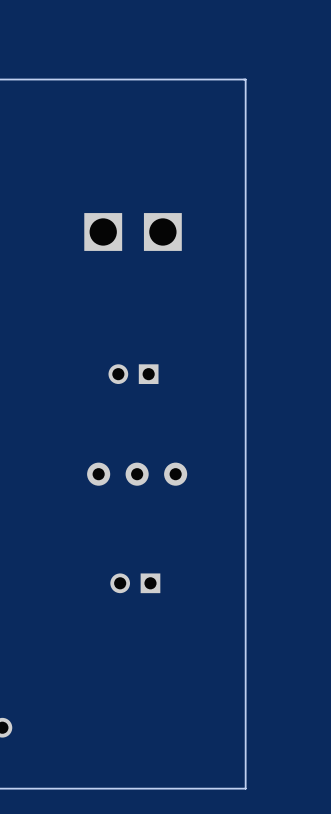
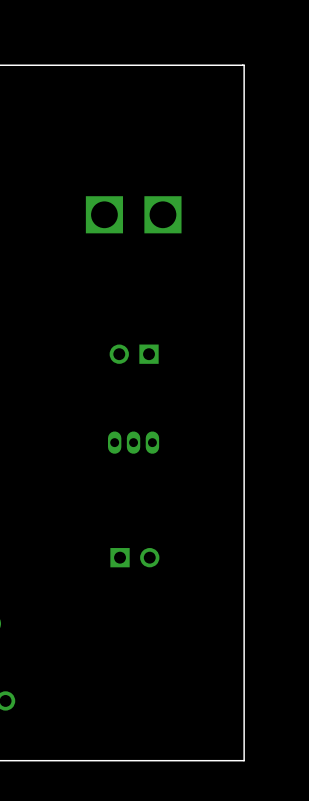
part footprint: [87, 462, 188, 486] -> [107, 431, 160, 454]
part rotation: 0° (135, 583) -> 180° (134, 557)

